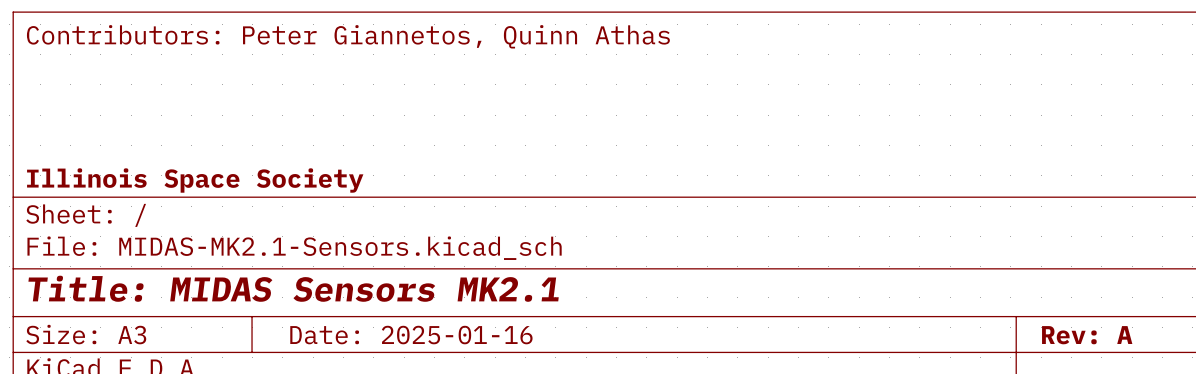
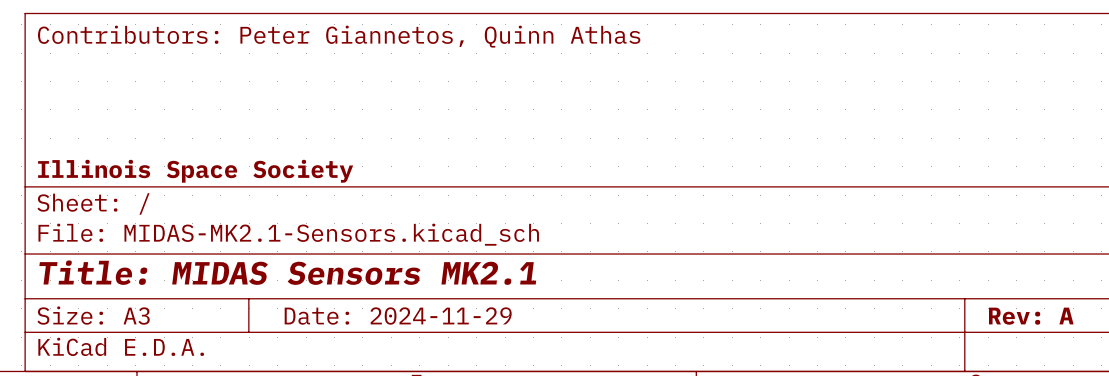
title block: Date: 2025-01-16 (411, 335) -> Date: 2024-11-29 (398, 316)

